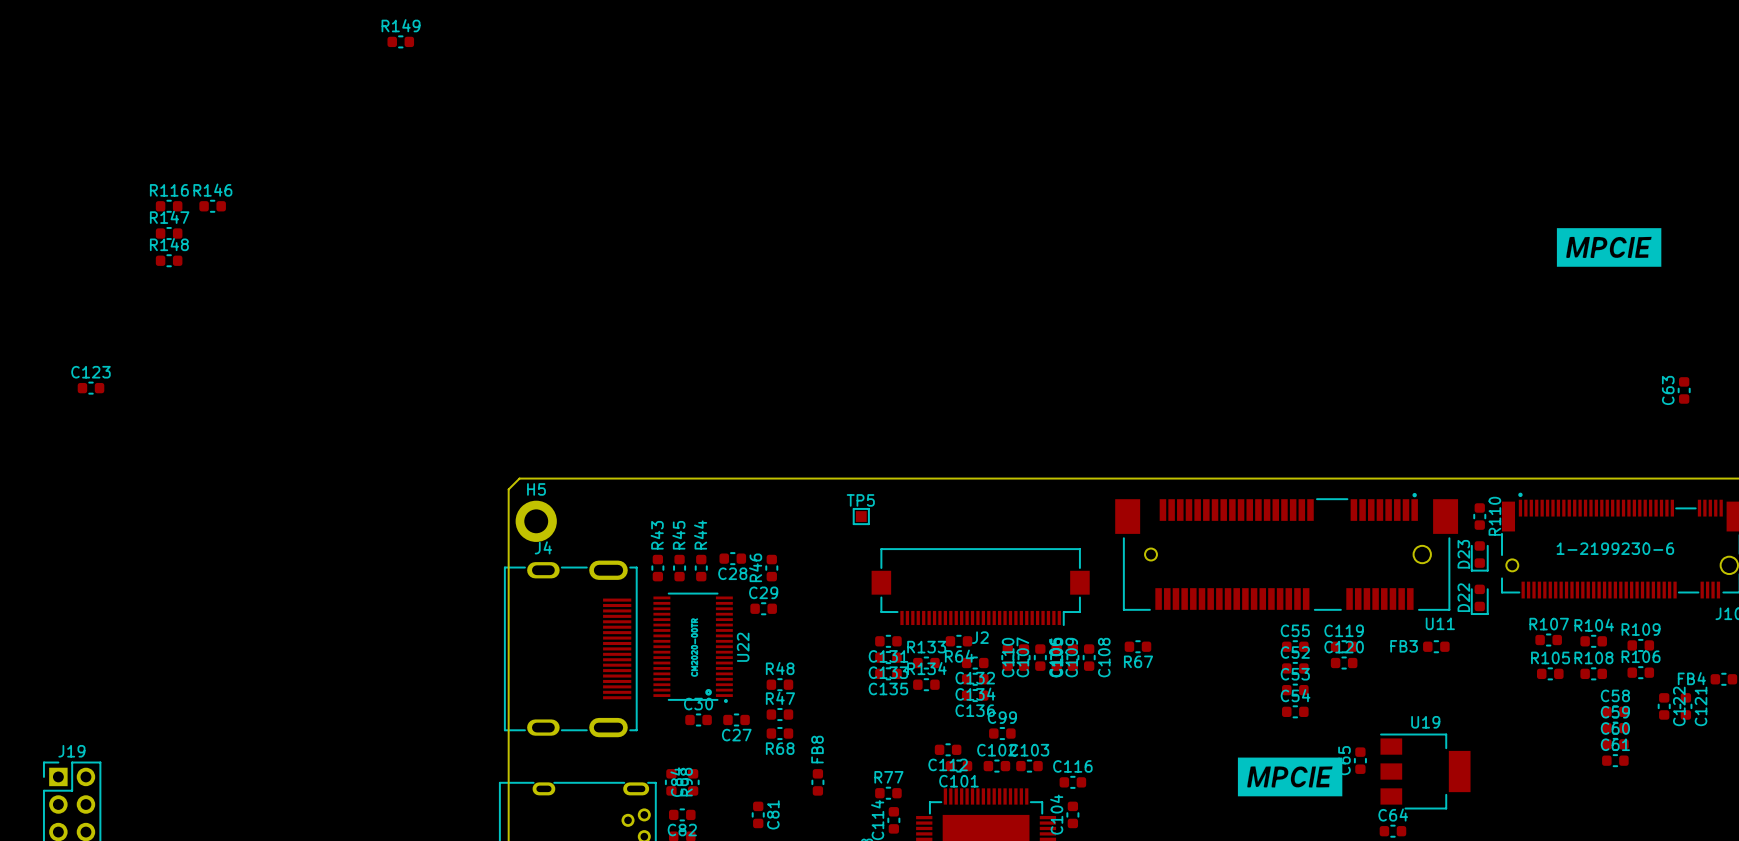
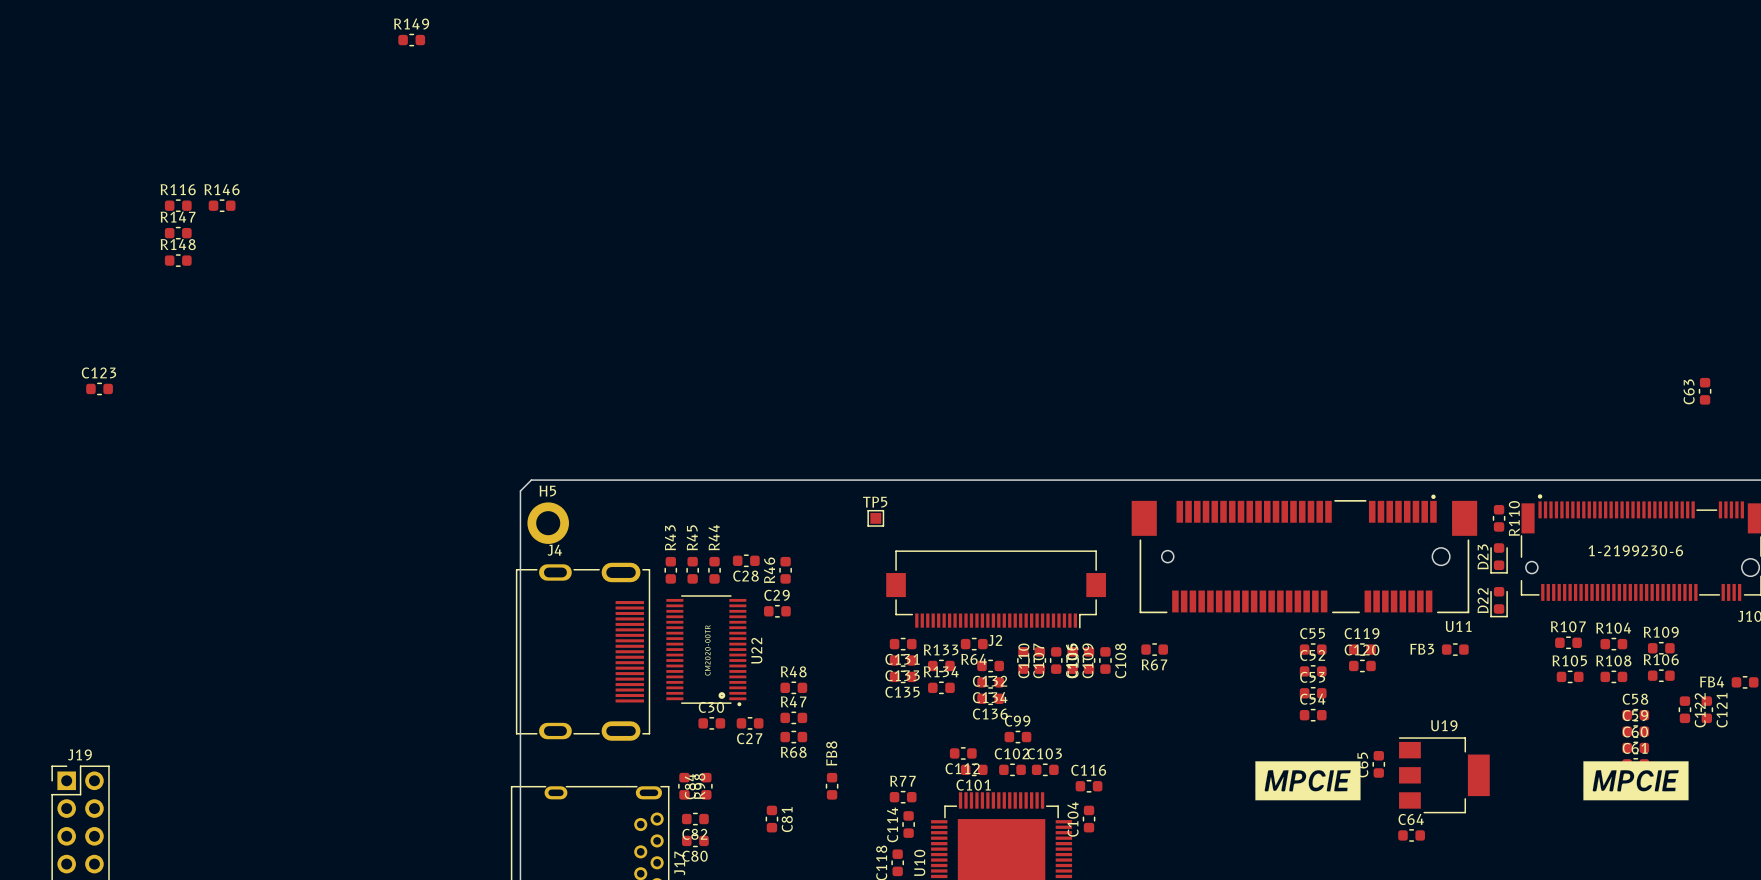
drawing: [1556, 228, 1662, 267] -> none
drawing: none -> [1583, 761, 1689, 801]

